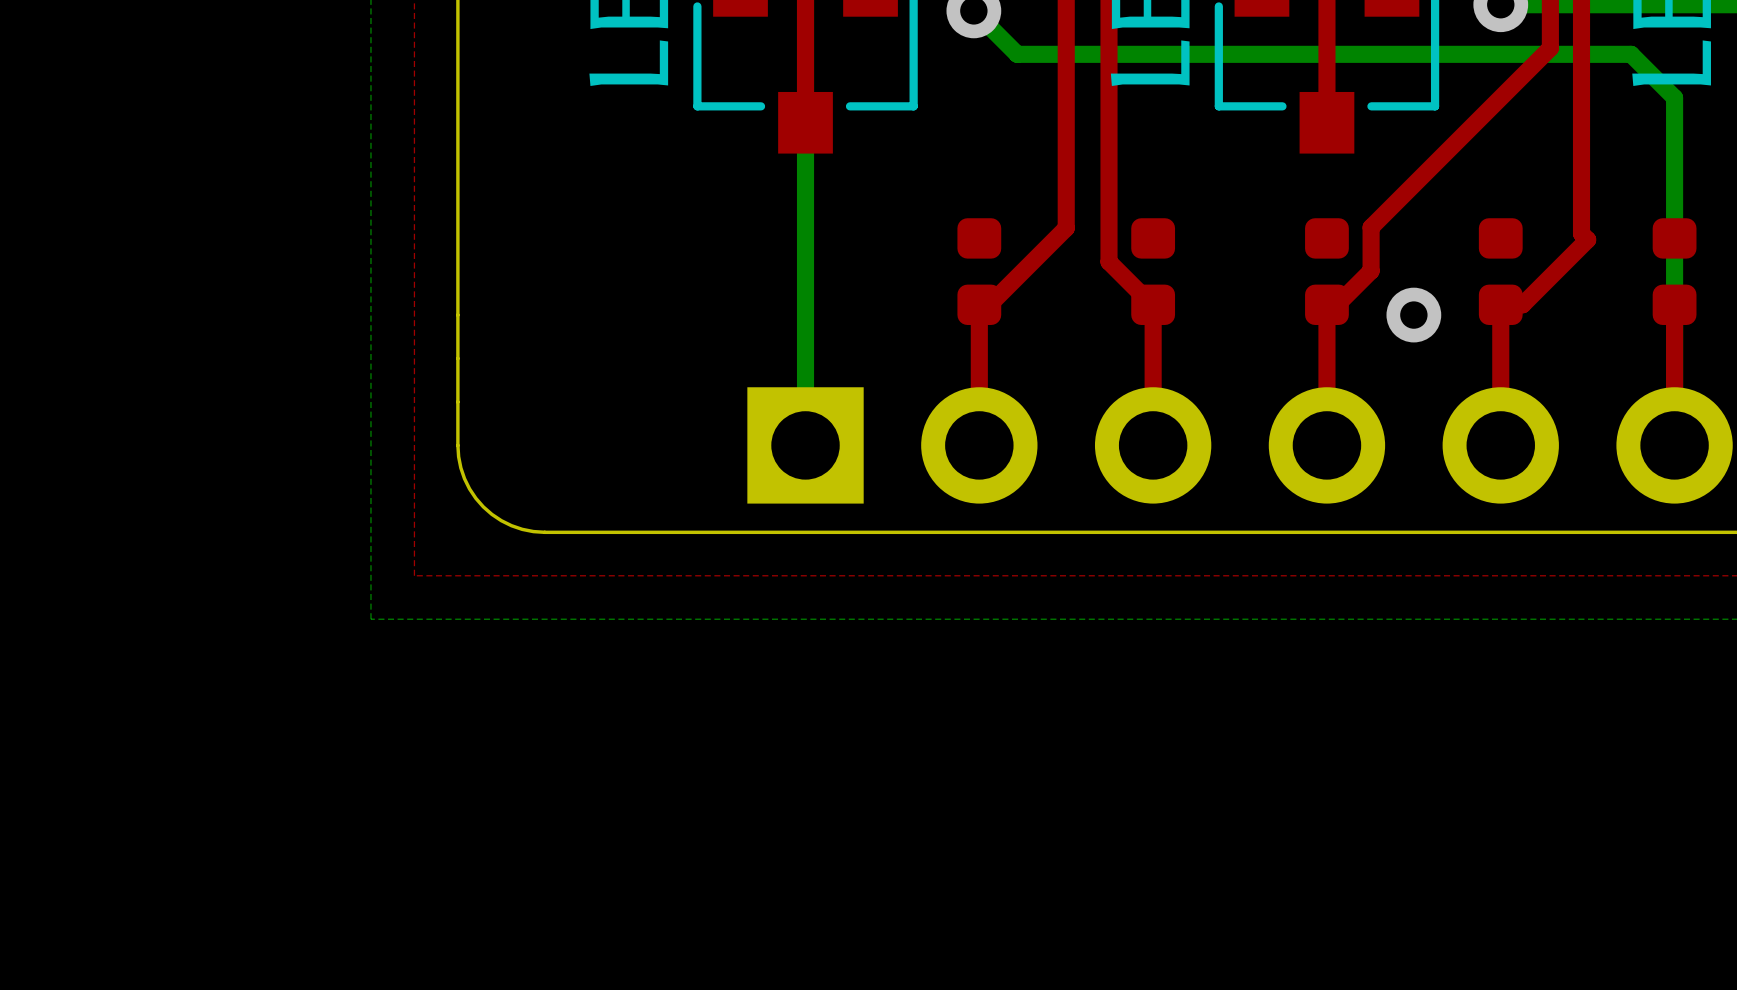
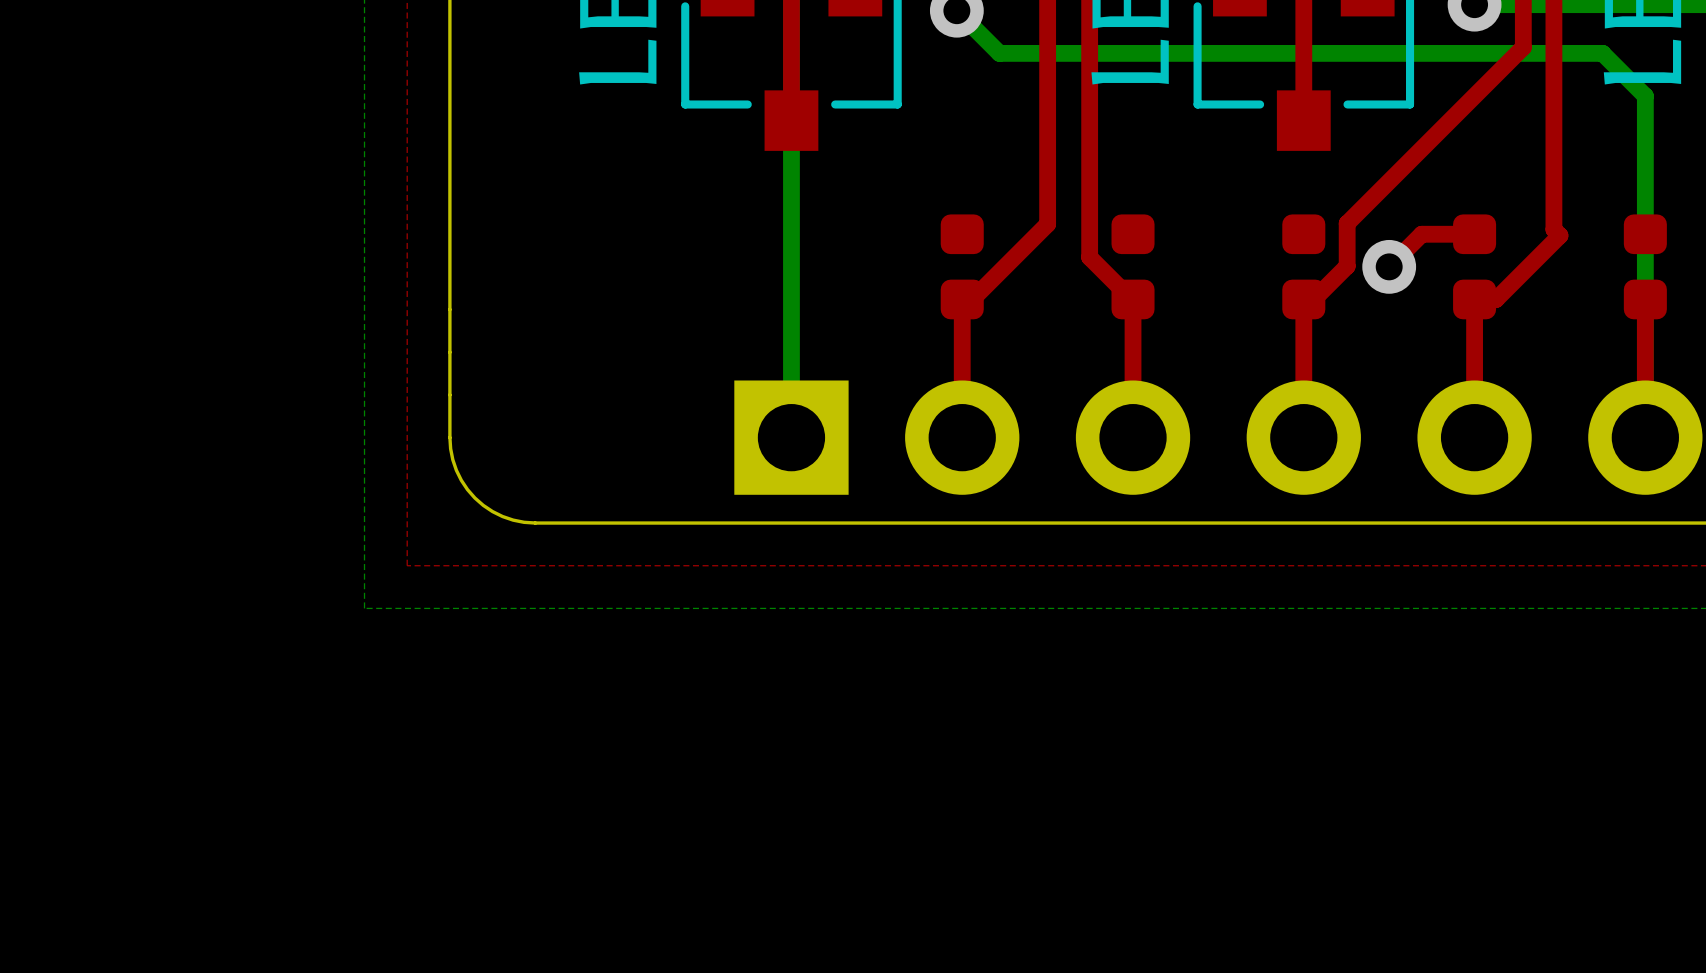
top track: none -> (1474, 234) (1421, 234) (1389, 266)
via position: (1413, 315) -> (1389, 266)

